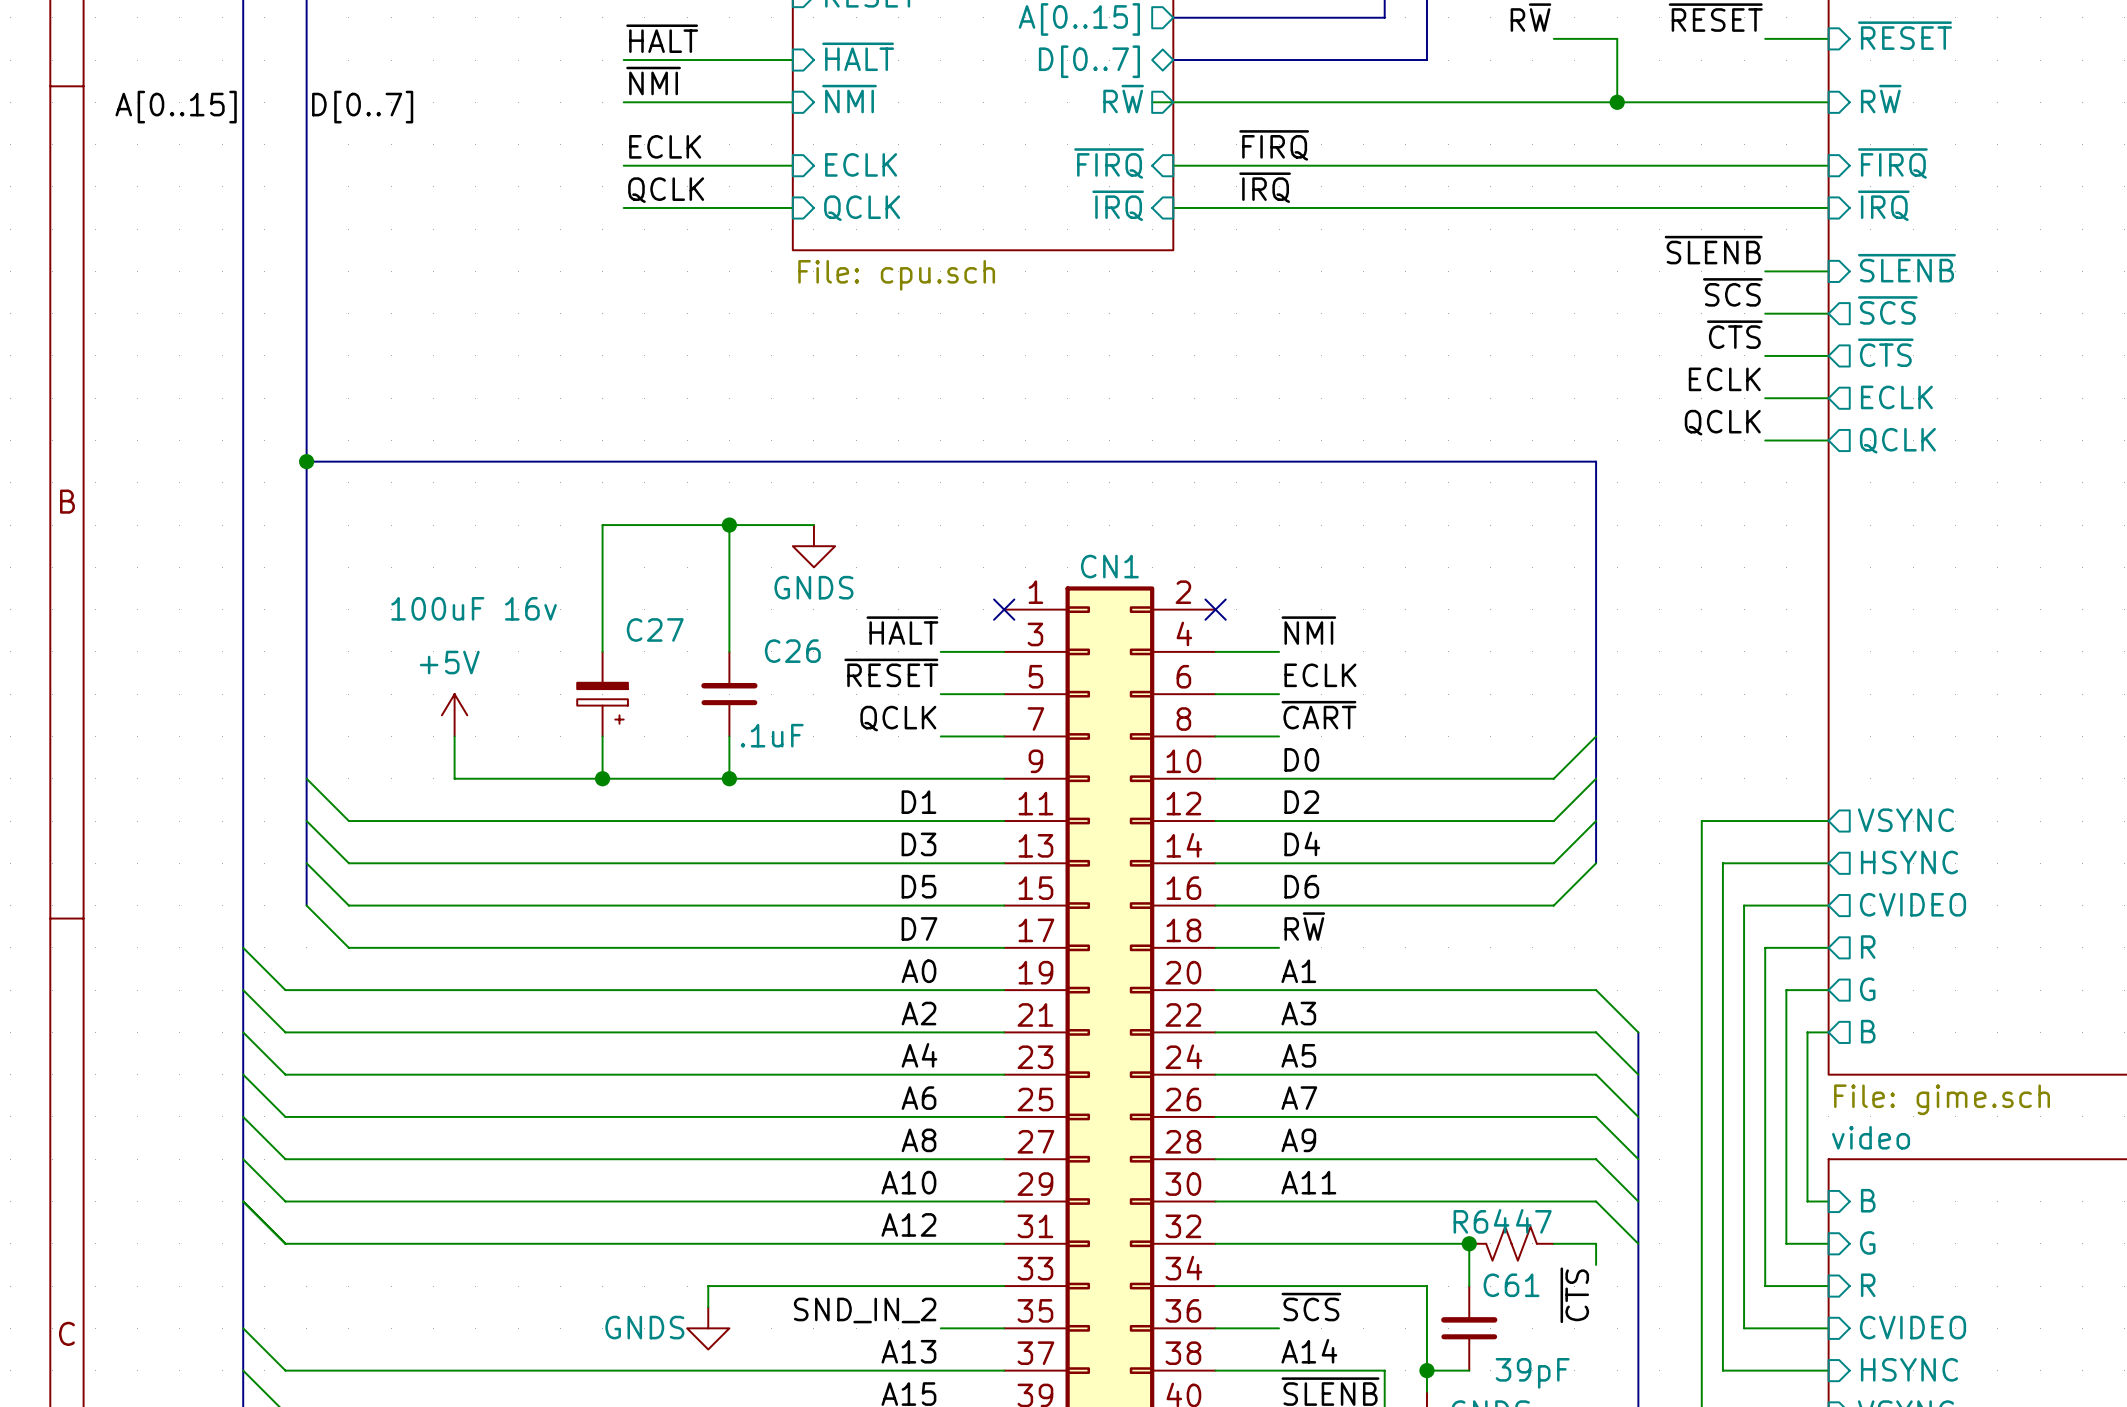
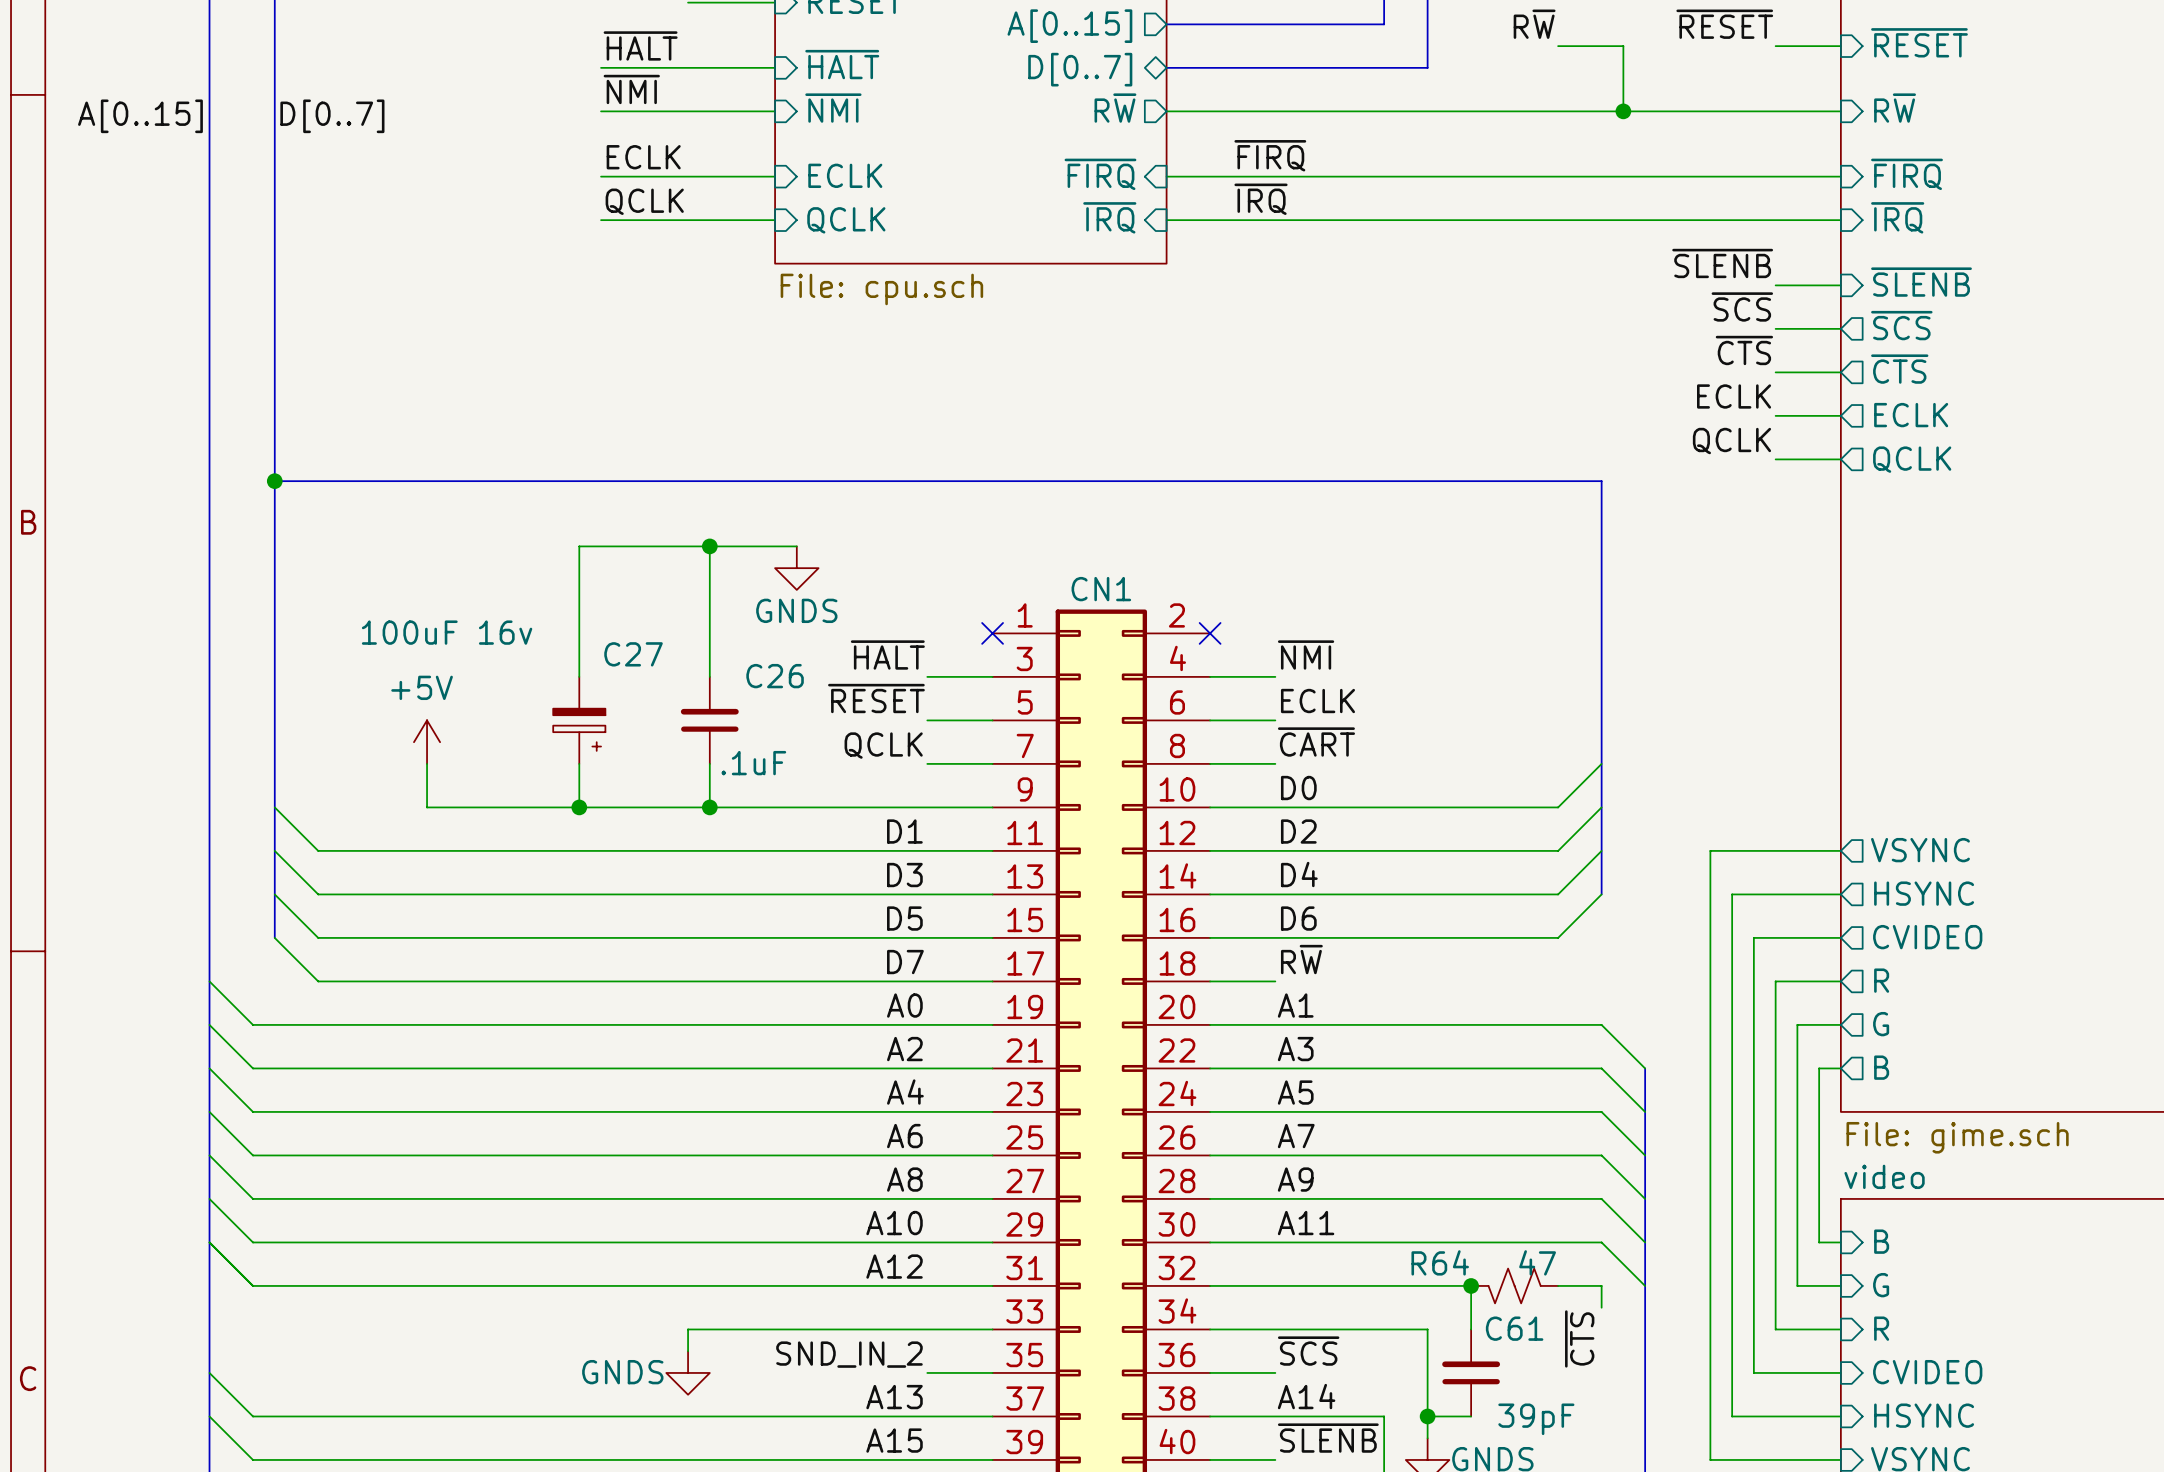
wire: (1152, 102) (1173, 102) -> none
R64 name position: R64 (1481, 1221) -> R64 (1440, 1262)

